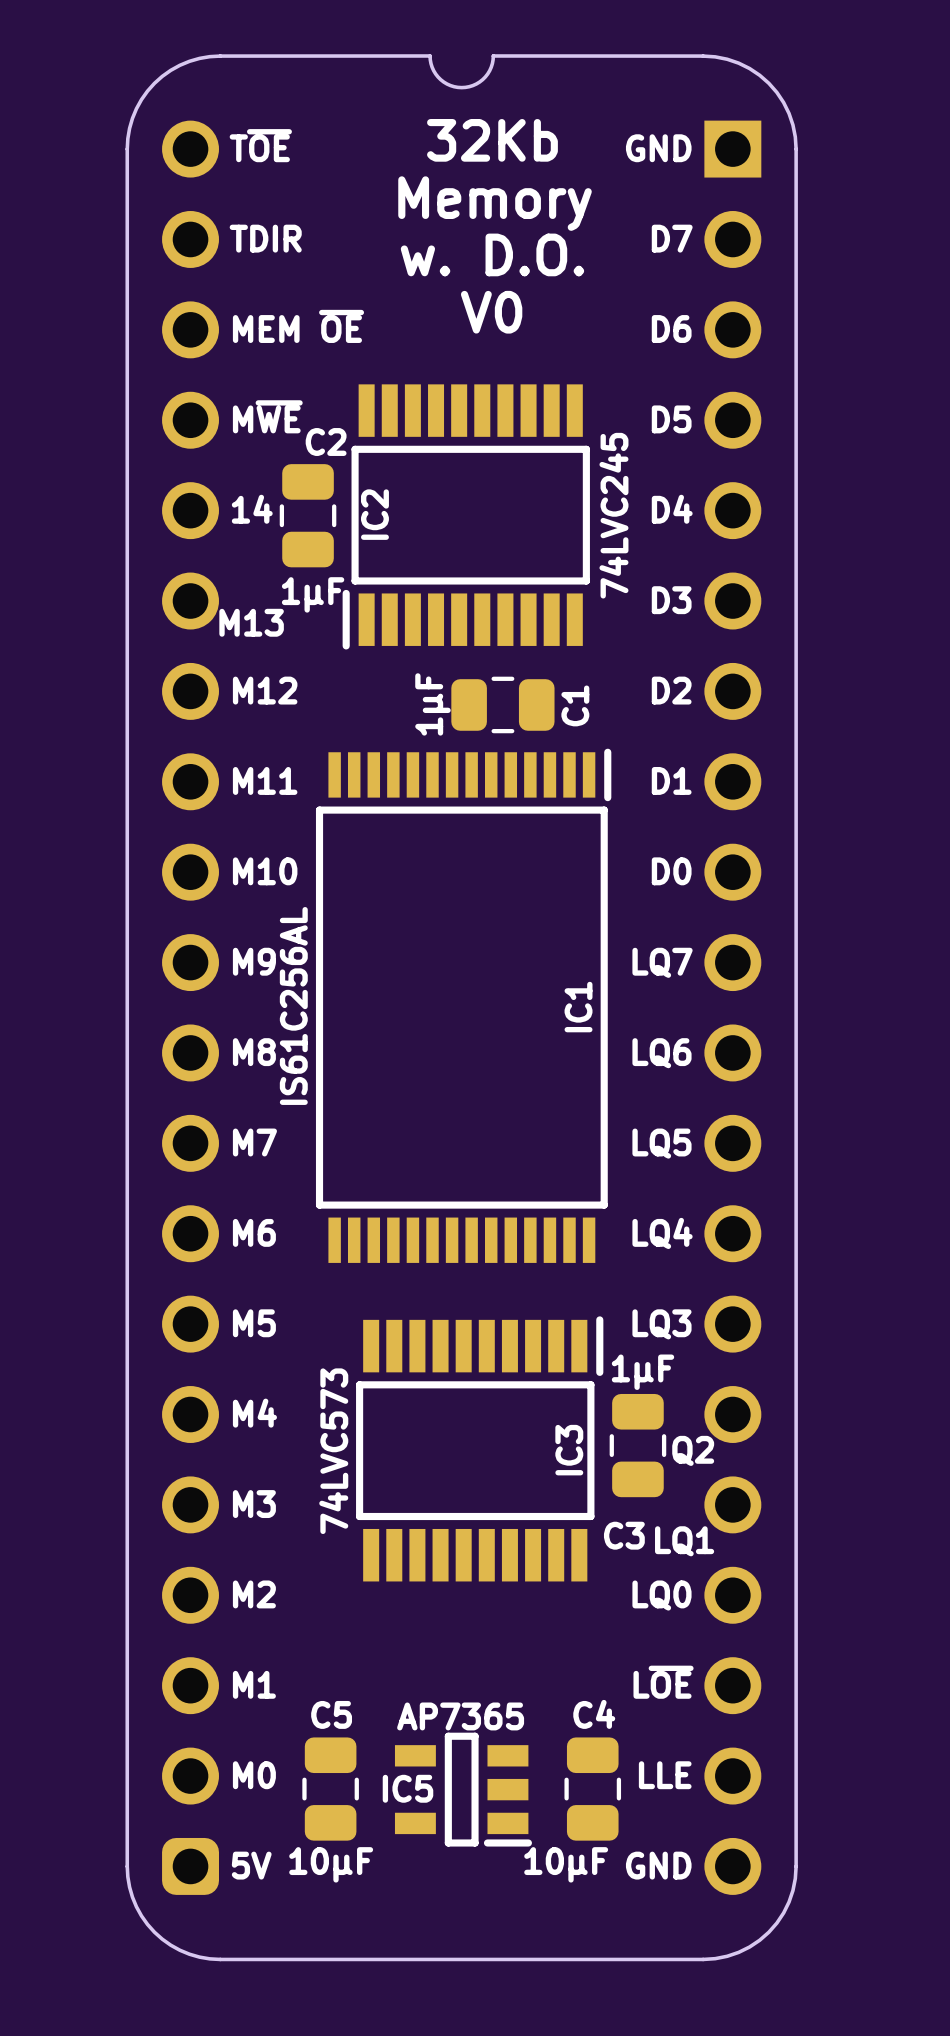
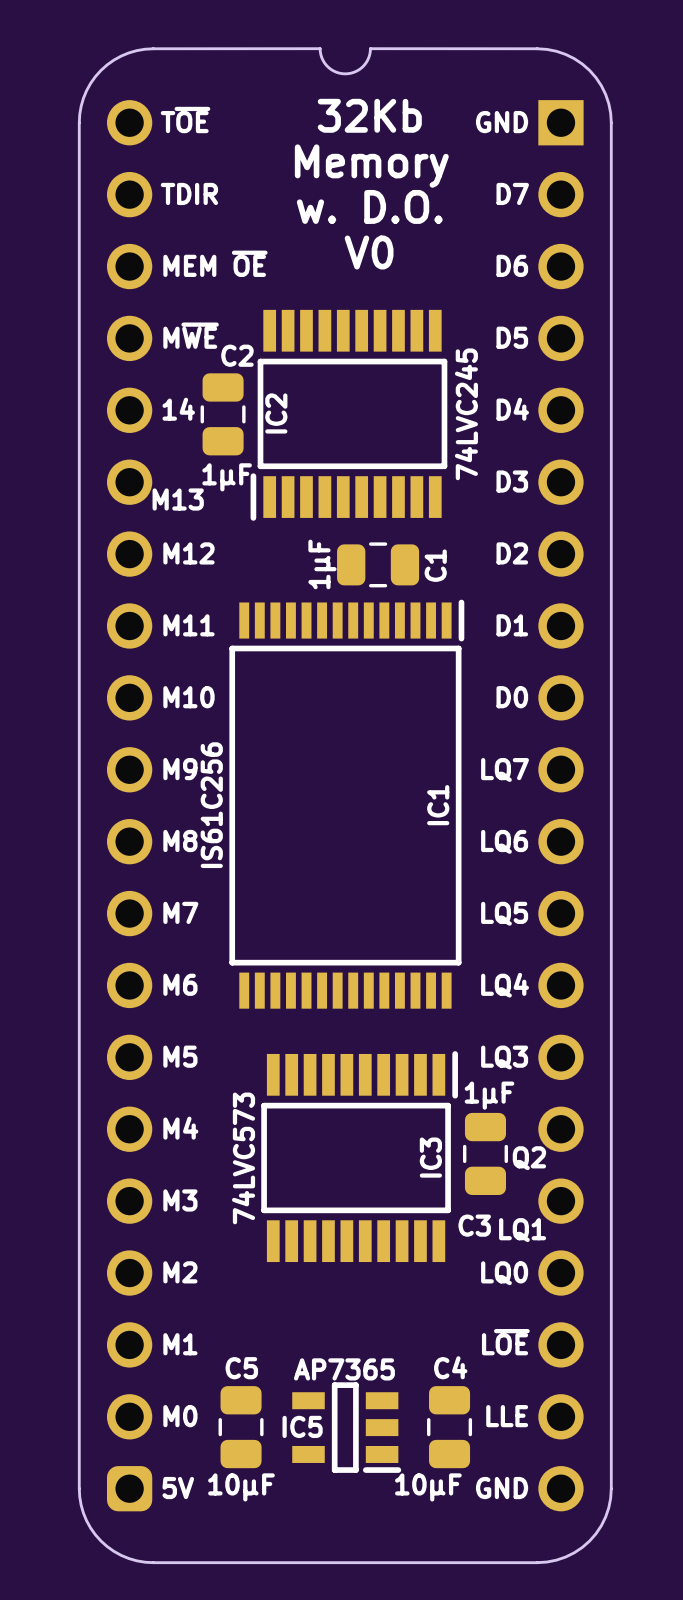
IC1 text: IS61C256AL (293, 1005) -> IS61C256 (211, 805)

